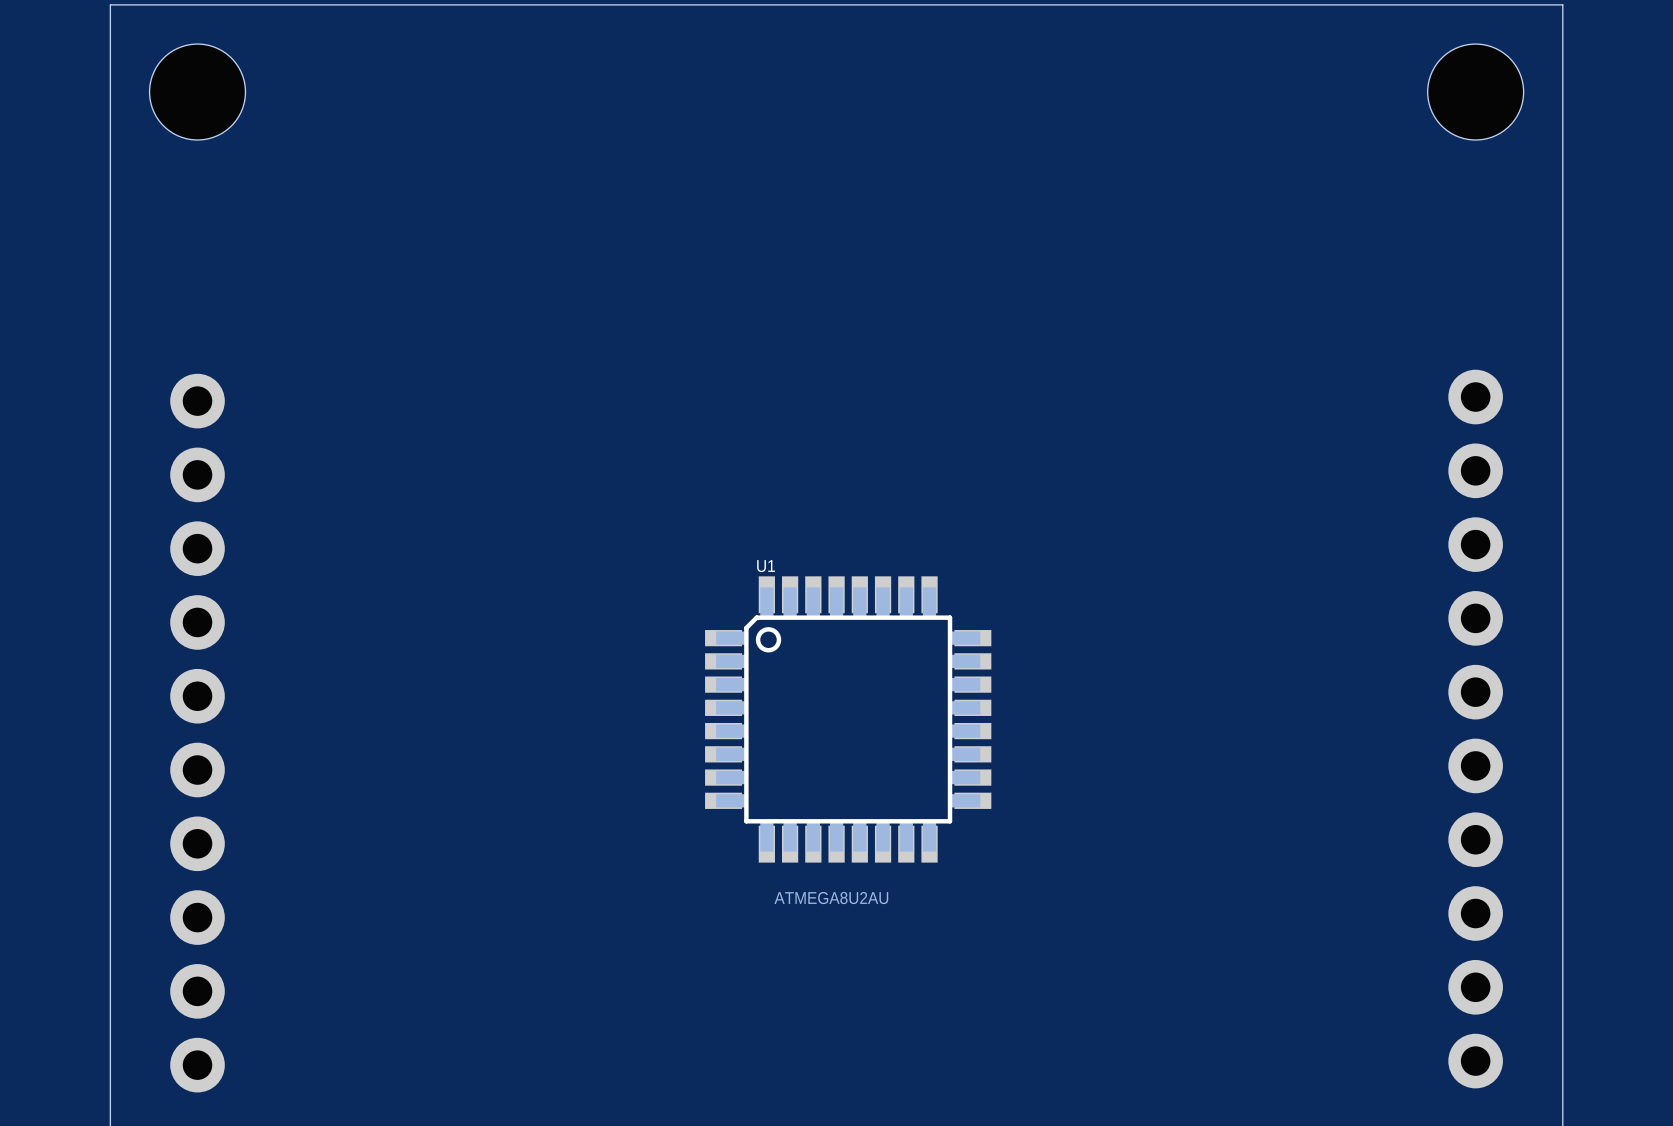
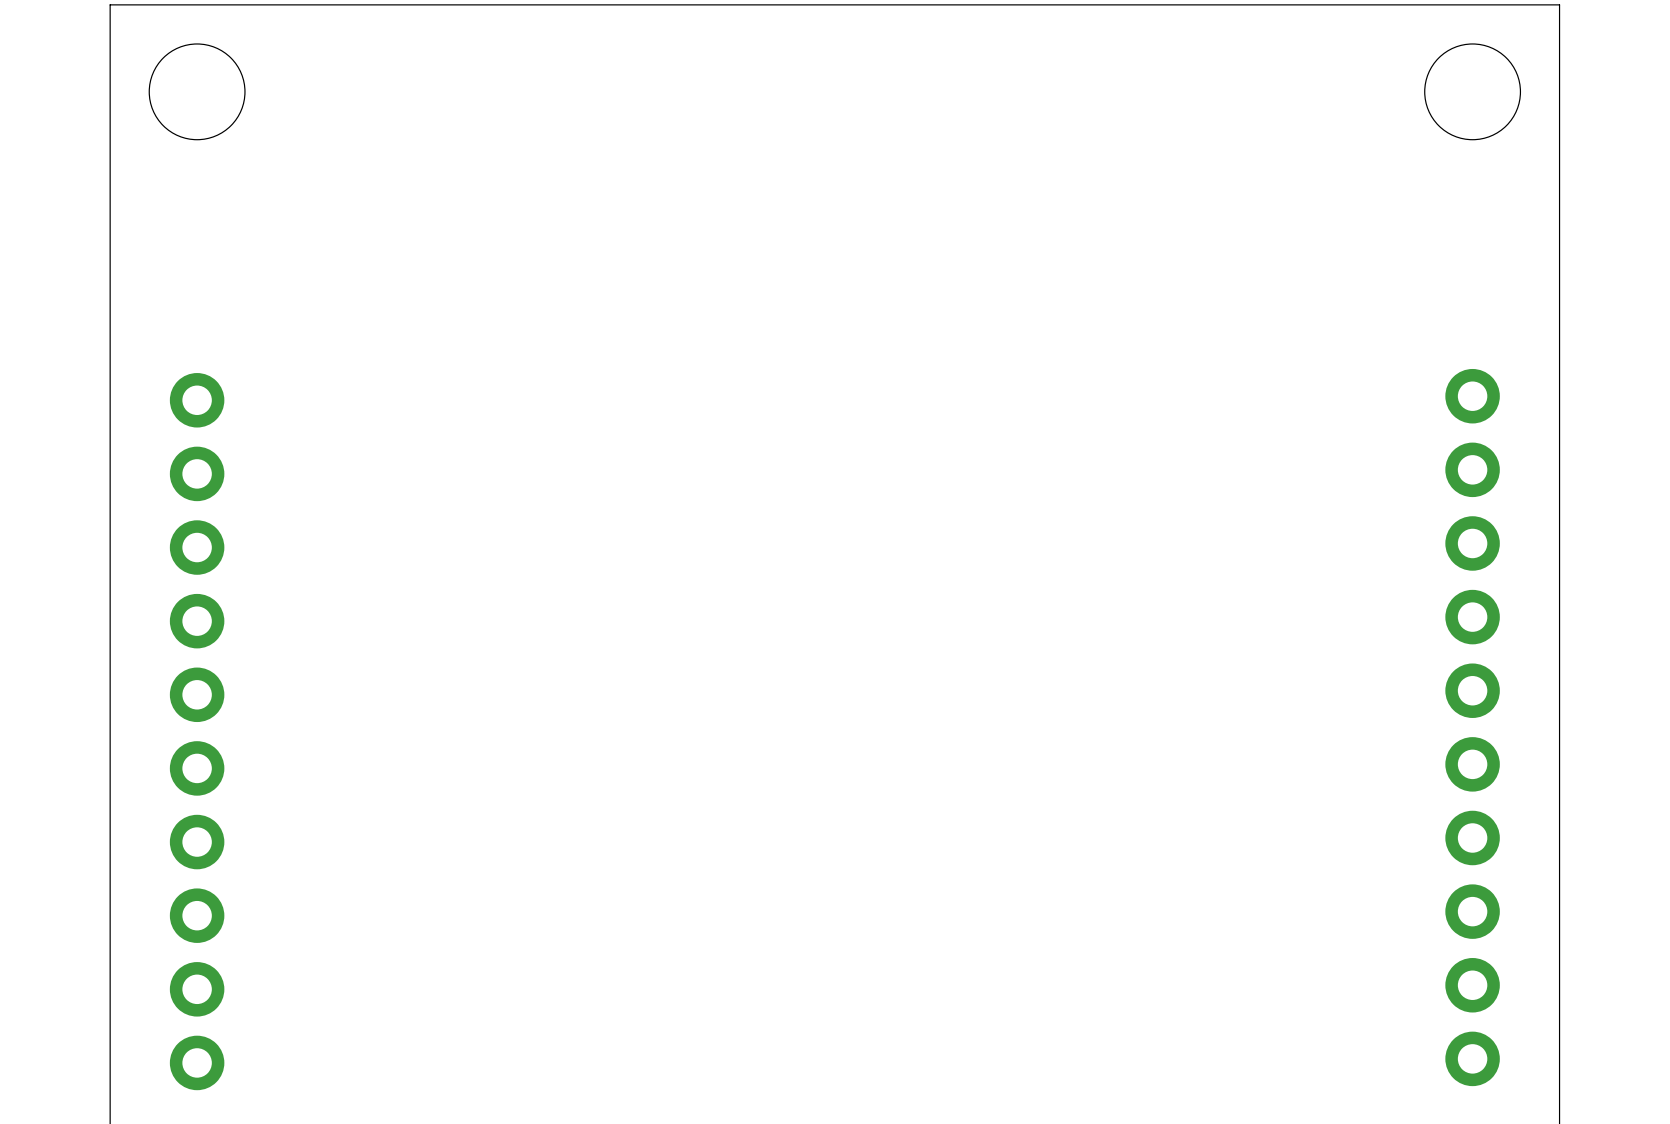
U1: ATMEGA8U2AU (848, 719) -> none

